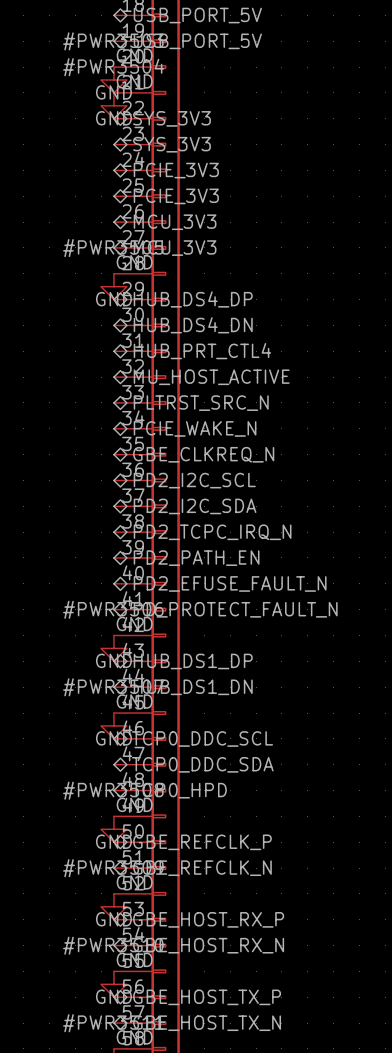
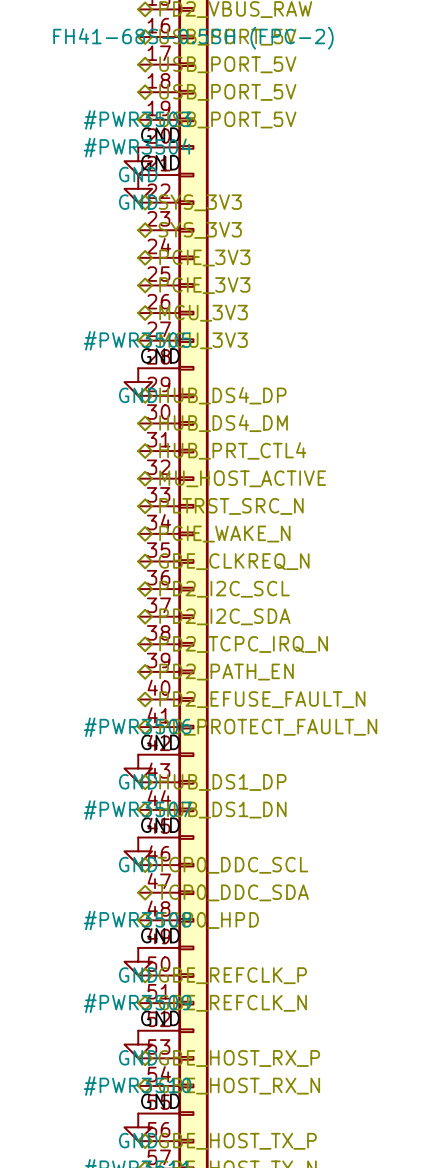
hierarchical label: HUB_DS4_DN (193, 325) -> HUB_DS4_DM (223, 423)

